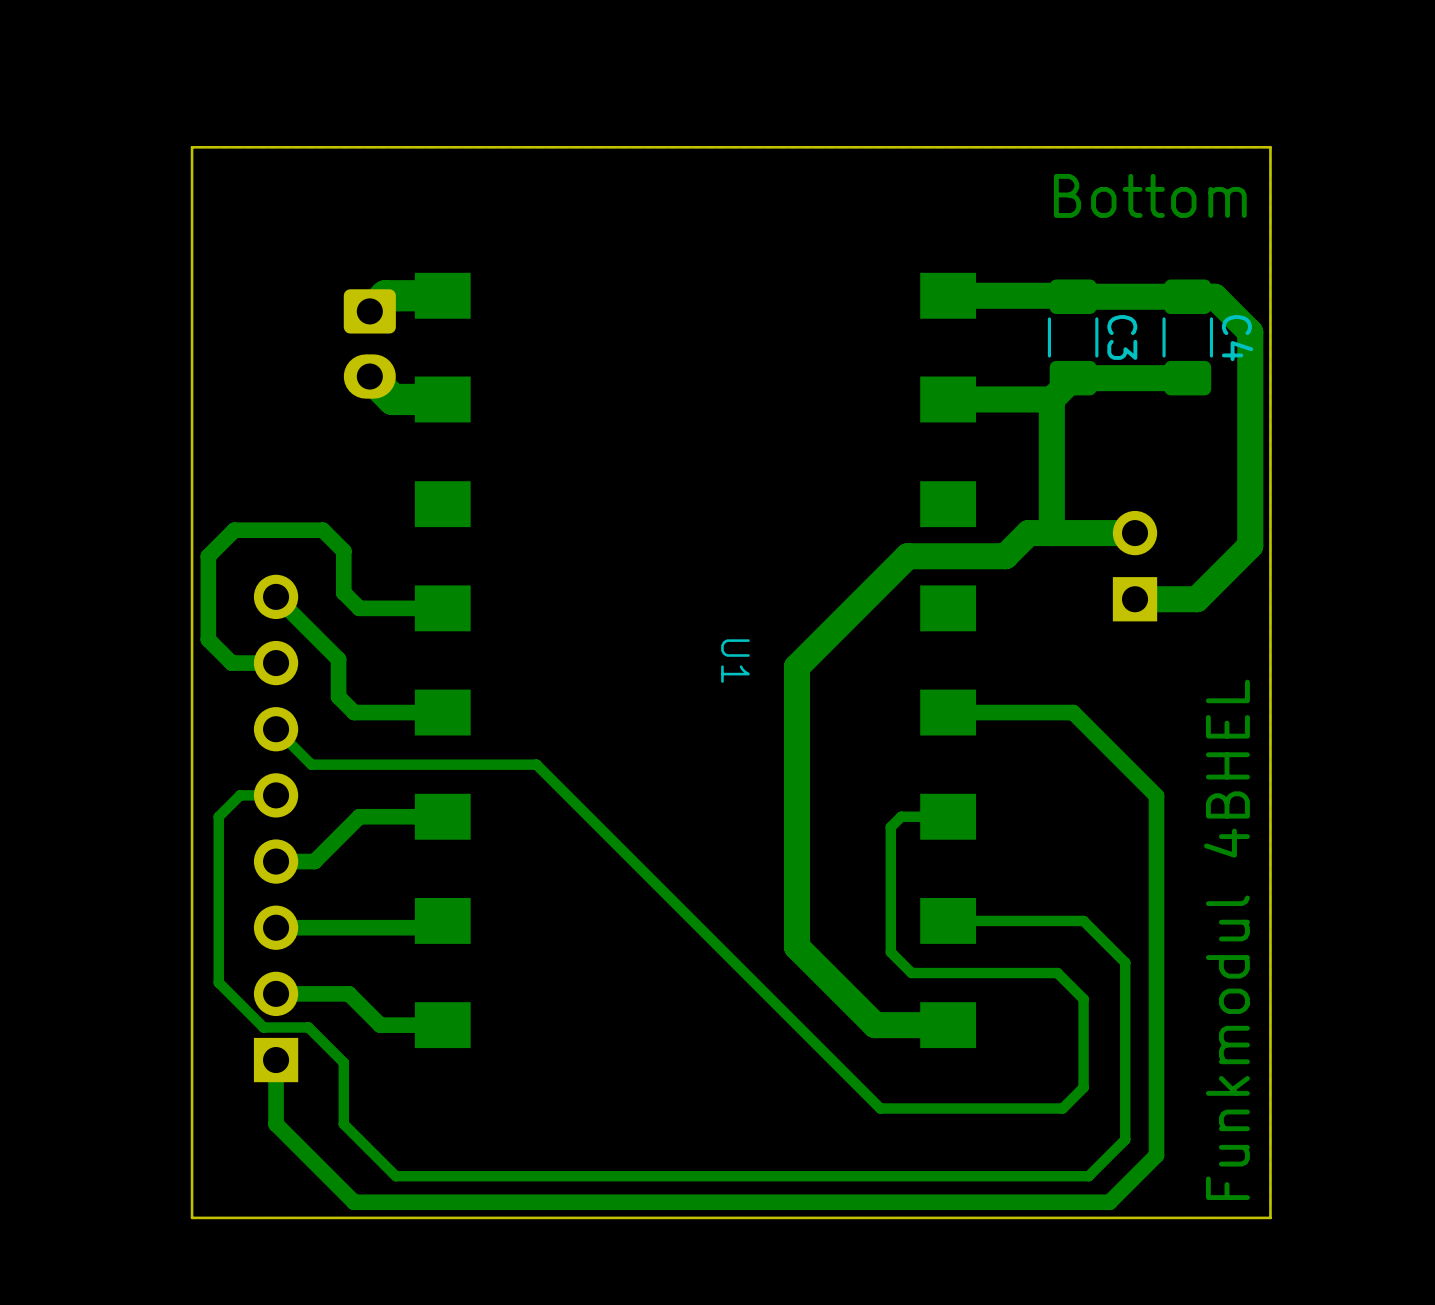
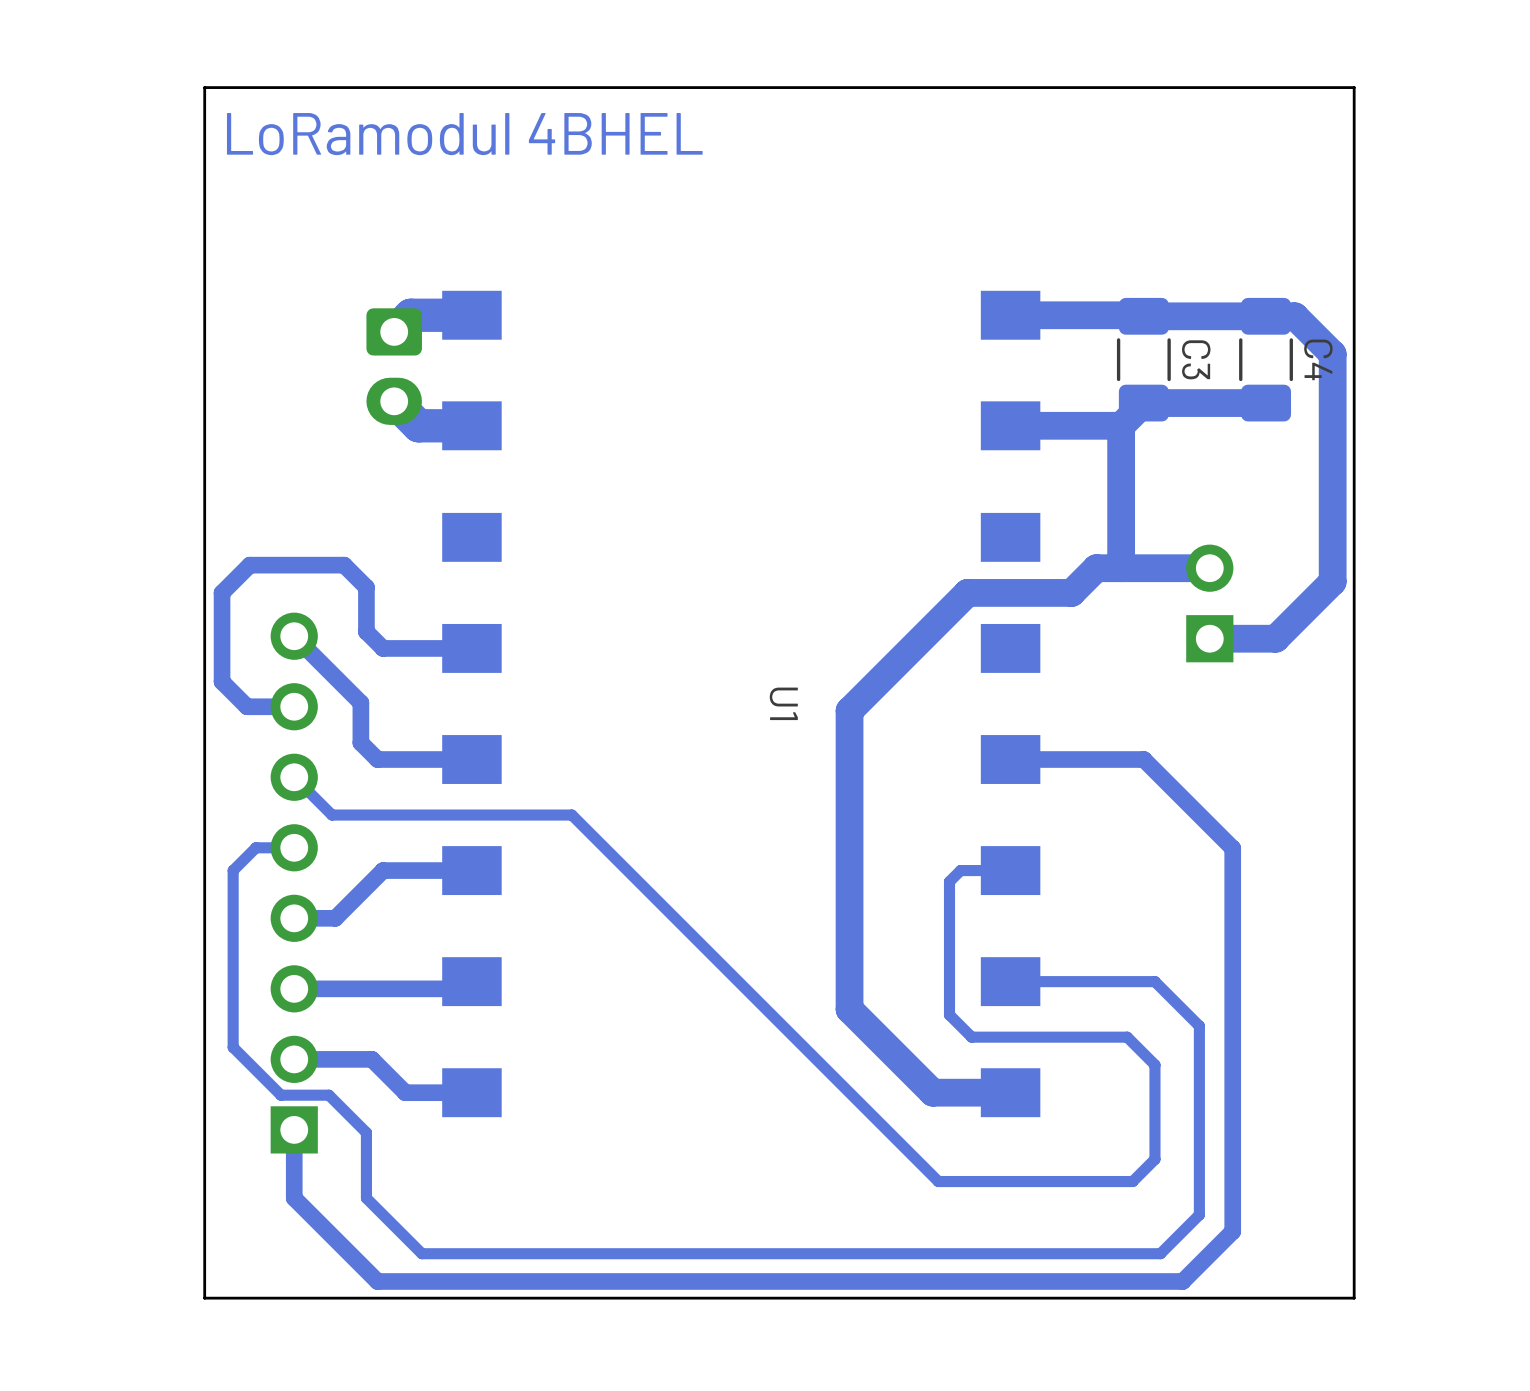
text: none -> LoRamodul 4BHEL (464, 134)
board edge: (1270, 147) (192, 147) -> (1354, 157) (1354, 87) (204, 87) (204, 157)
text: Bottom (1150, 195) -> none
text: Funkmodul 4BHEL (1226, 939) -> none

